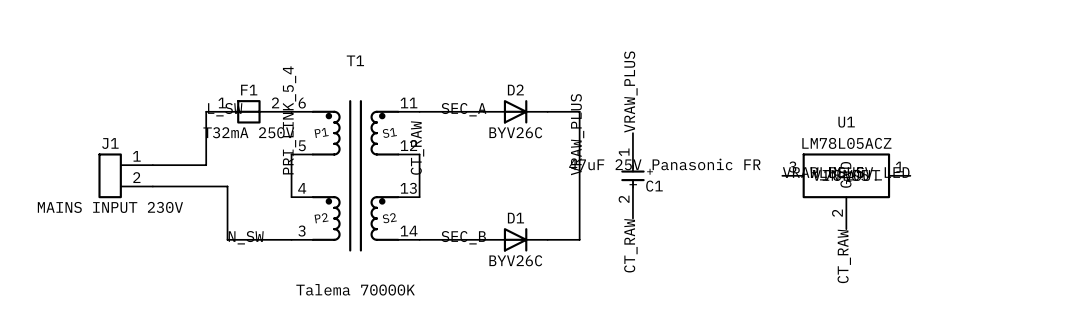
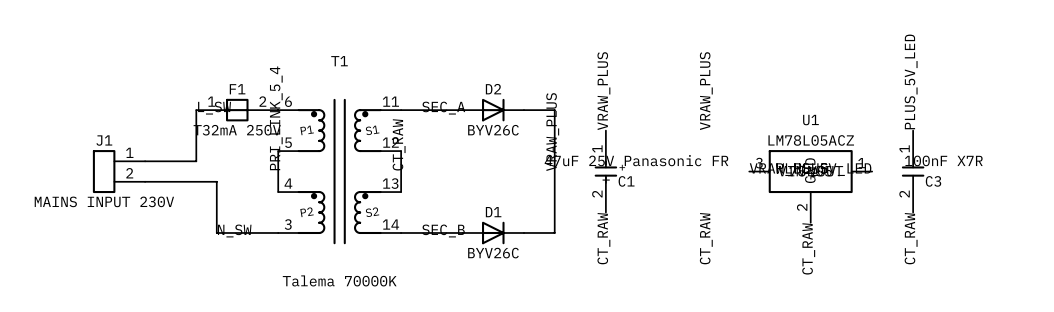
label: none -> PLUS_5V_LED (911, 81)
label: none -> VRAW_PLUS (706, 91)
C3: none -> 100nF X7R (913, 171)
label: none -> CT_RAW (706, 238)
label: none -> CT_RAW (911, 238)

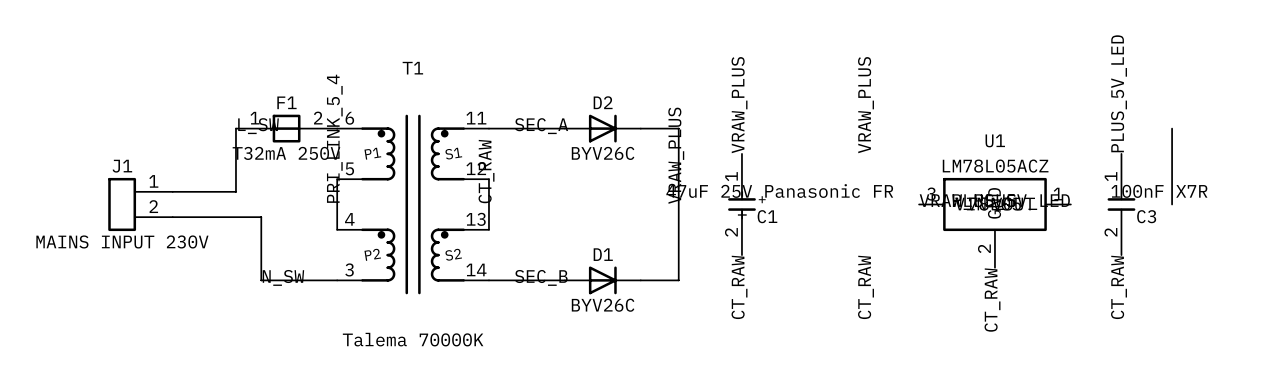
wire: none -> (1172, 128) (1172, 204)

